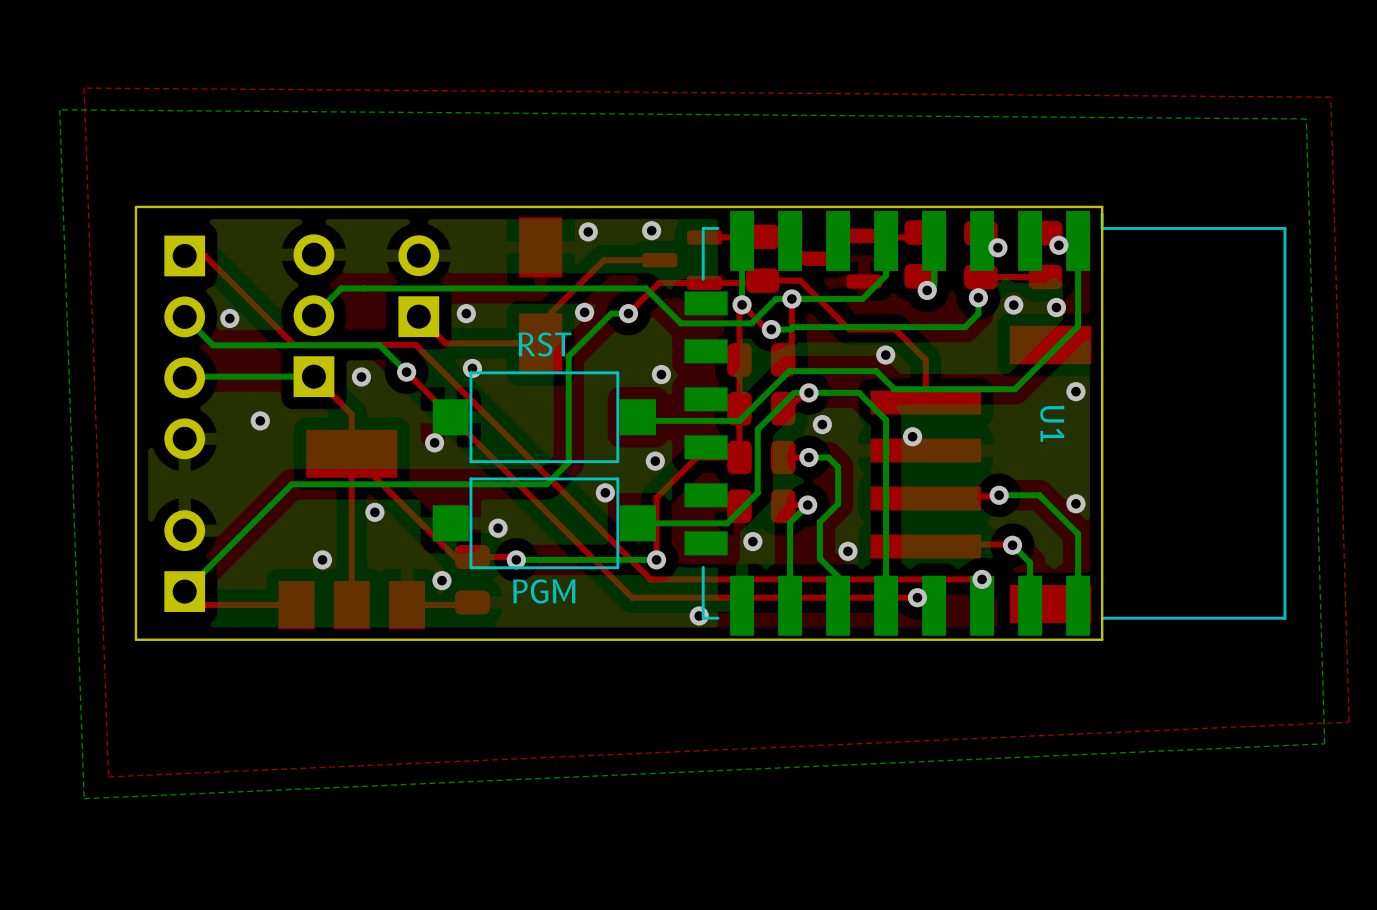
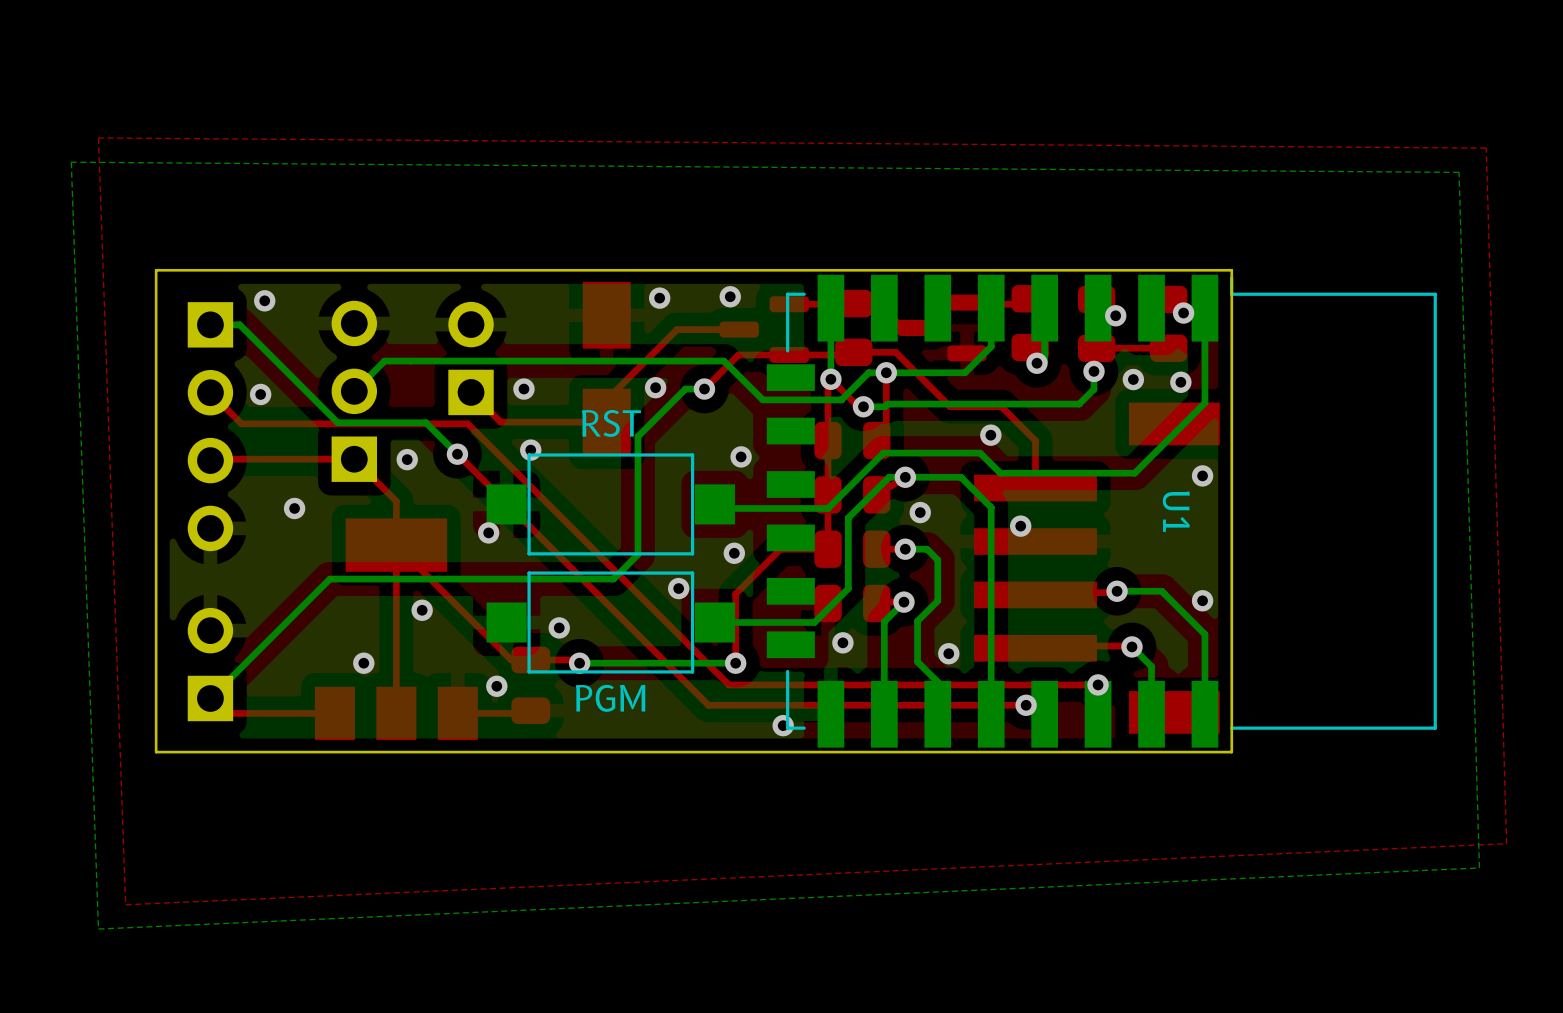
via: none -> (264, 300)
top track: (184, 255) (205, 255) (293, 344) -> (210, 392) (241, 423) (332, 423)
bottom track: (184, 316) (213, 345) (379, 345) -> (210, 324) (239, 324) (337, 422) (426, 422) (427, 424)
top track: none -> (354, 459) (210, 460)
bottom track: (313, 376) (184, 377) -> none

